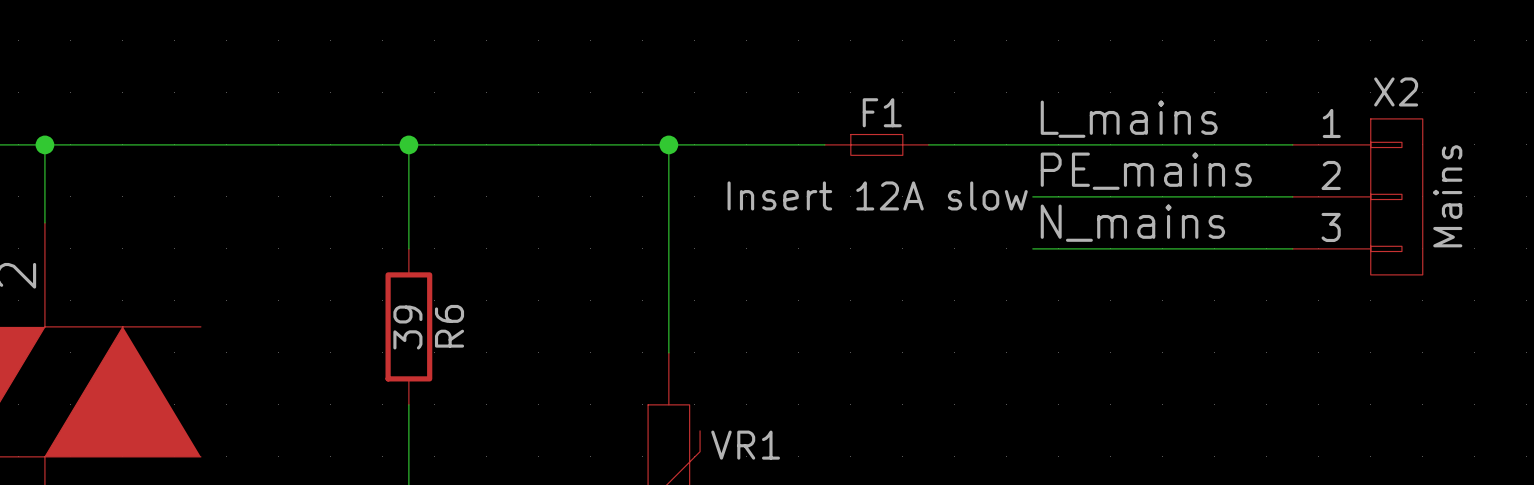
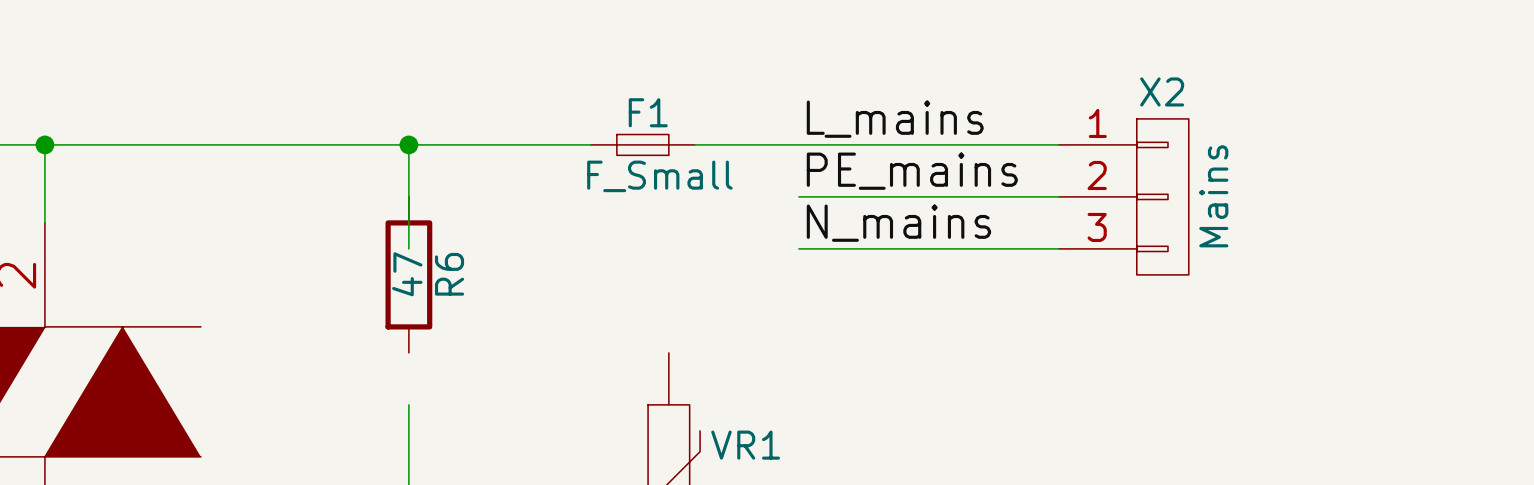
label position: L_mains (1129, 119) -> L_mains (895, 119)
wire: (668, 144) (668, 352) -> none
junction: (668, 144) -> none
F1 position: (876, 144) -> (642, 144)
wire: (1058, 144) (1292, 144) -> none
label position: PE_mains (1146, 171) -> PE_mains (912, 171)
F1 value: Insert 12A slow (877, 195) -> F_Small (659, 176)
wire: (1058, 196) (1292, 196) -> (798, 196) (1032, 196)
X2 position: (1357, 196) -> (1123, 196)
label position: N_mains (1132, 223) -> N_mains (898, 223)
wire: (1058, 248) (1292, 248) -> (798, 248) (1032, 248)
R6 position: (408, 326) -> (408, 274)
R6 value: 39 (407, 327) -> 47 (407, 274)

